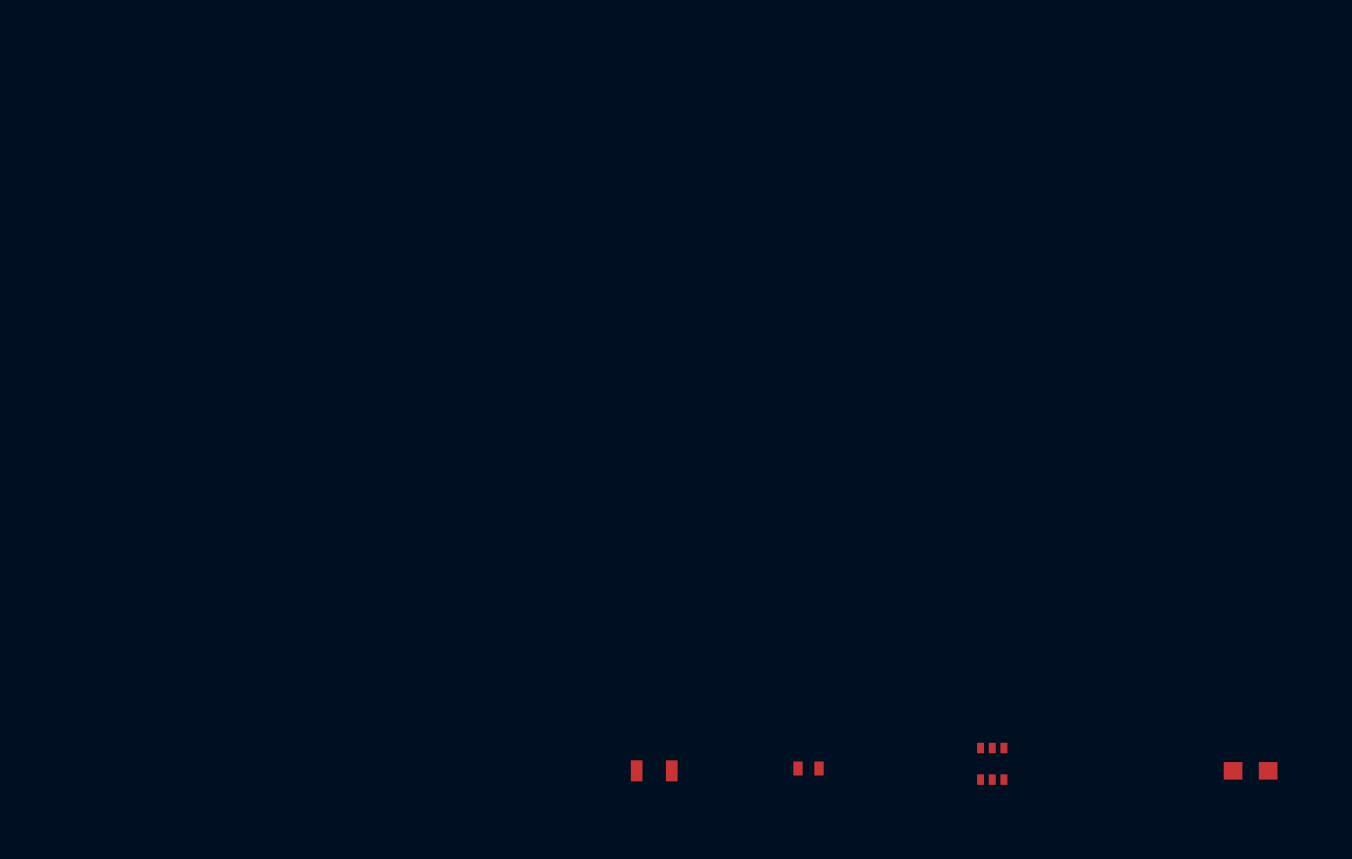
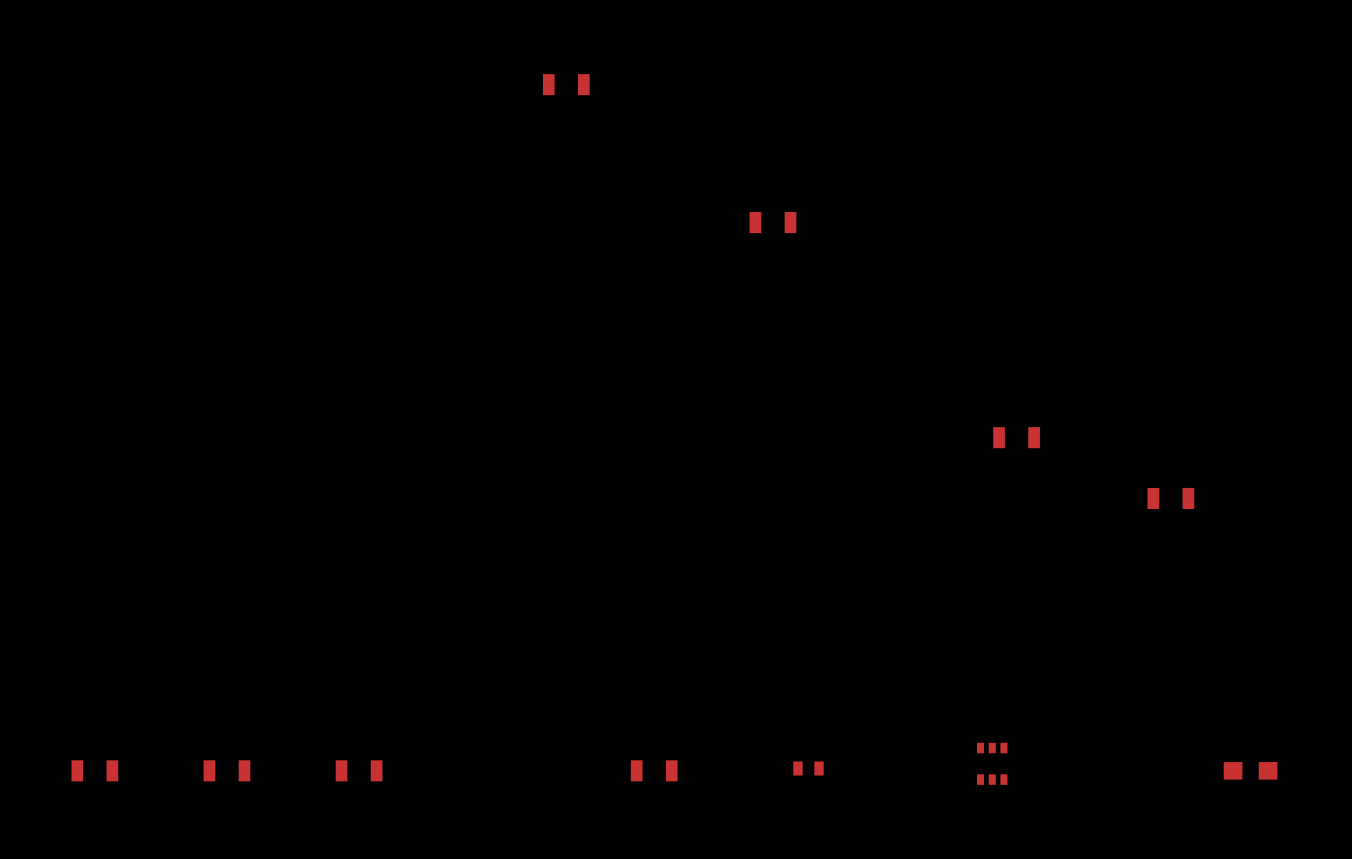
part: none -> (566, 84)
part: none -> (772, 222)
part: none -> (1016, 437)
part: none -> (1170, 498)
part: none -> (94, 770)
part: none -> (226, 770)
part: none -> (359, 770)

